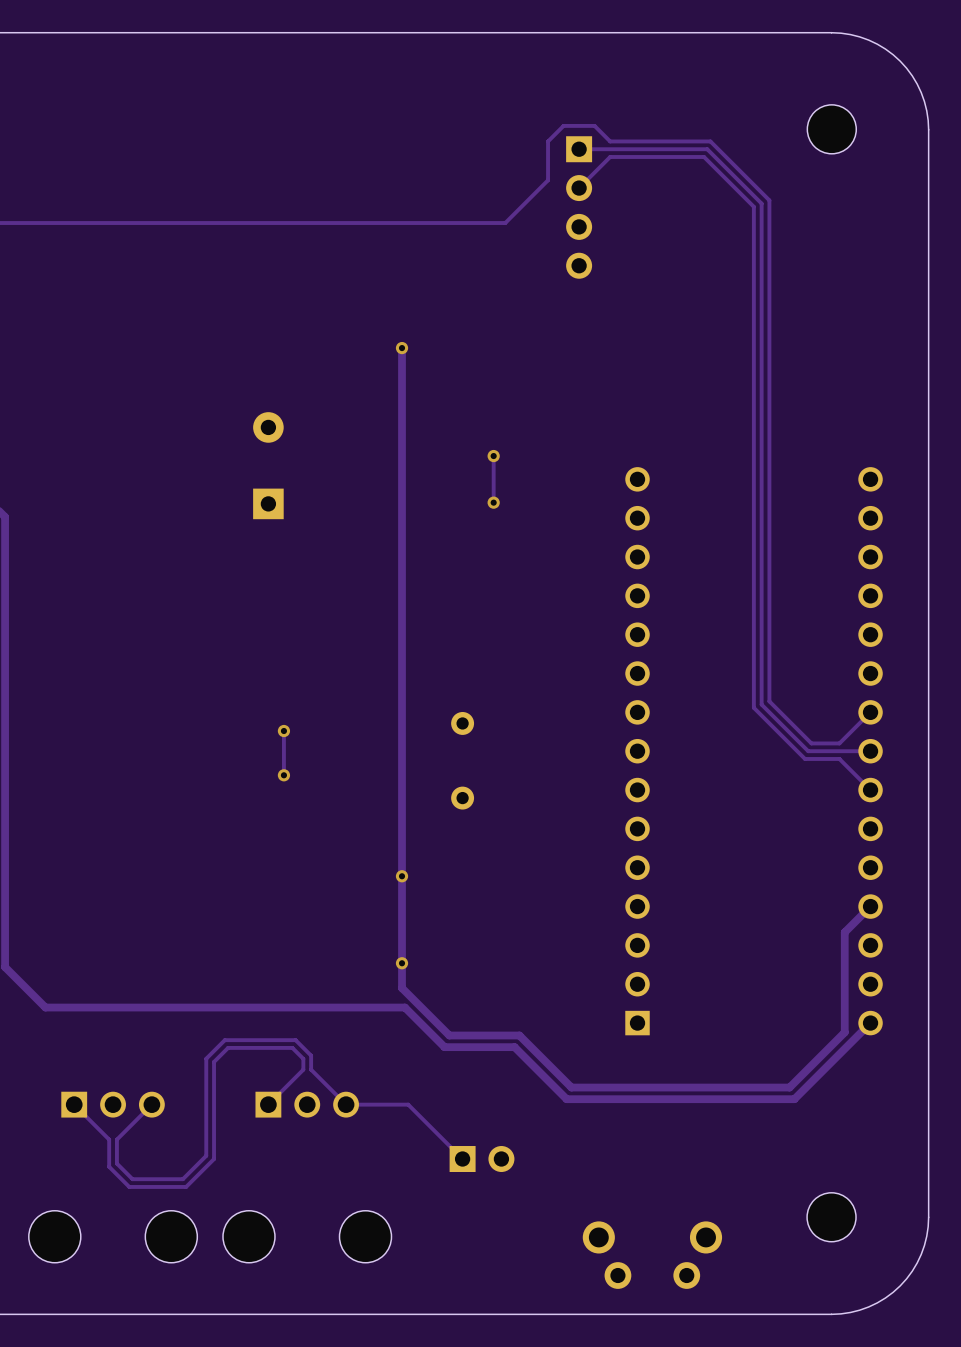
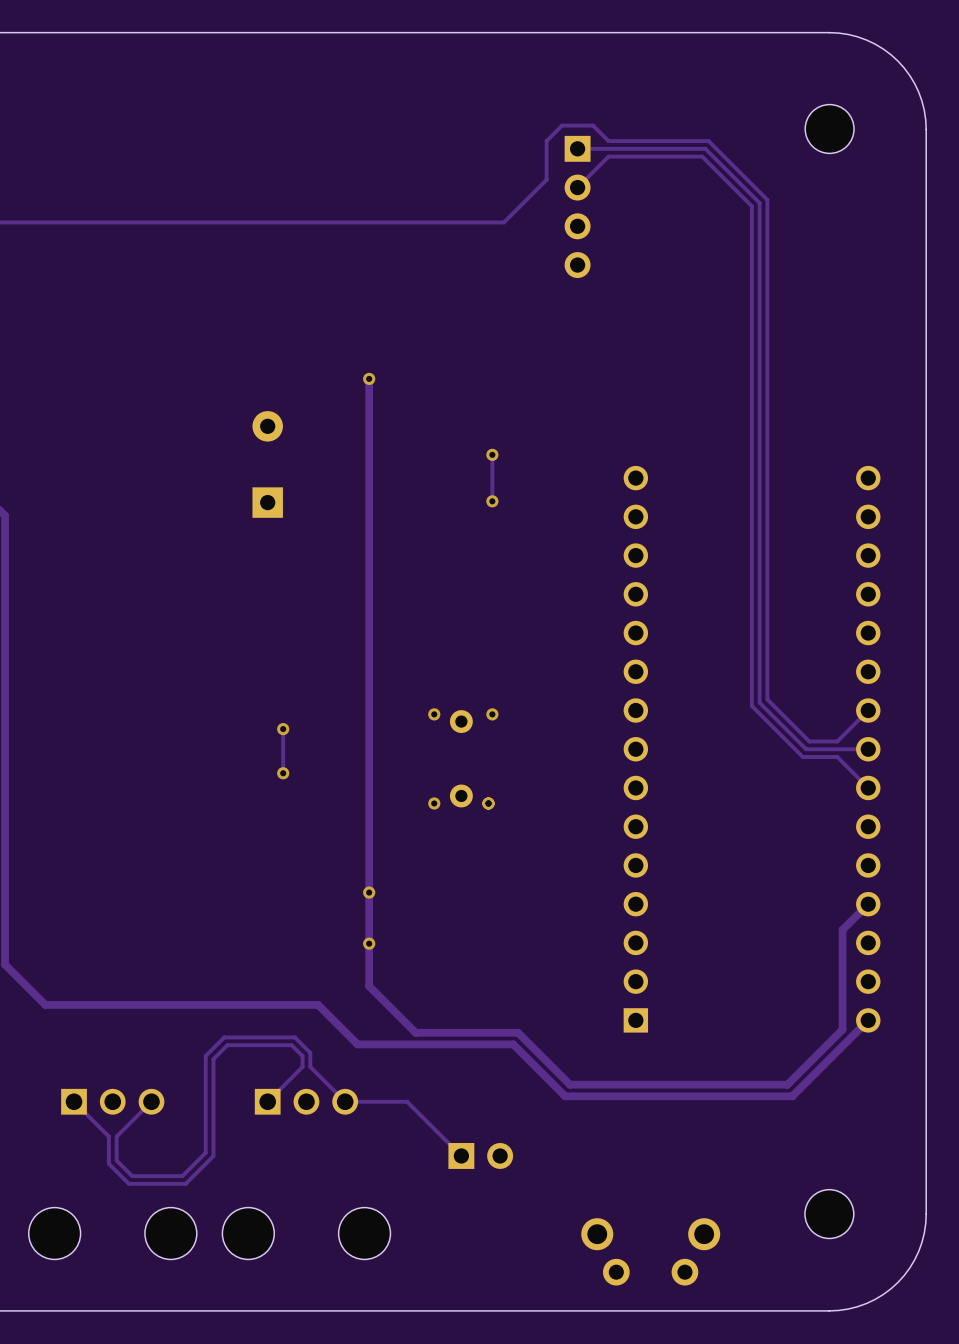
track: (402, 348) (402, 988) (449, 1035) -> (369, 378) (369, 986) (415, 1032) (448, 1032)
via position: (402, 348) -> (369, 378)
via: none -> (434, 714)
via: none -> (492, 714)
via: none -> (434, 803)
via: none -> (488, 803)
via position: (402, 876) -> (369, 892)
via position: (402, 963) -> (369, 943)
track: (318, 1007) (404, 1007) (444, 1047) -> (318, 1004) (357, 1044) (443, 1044)

